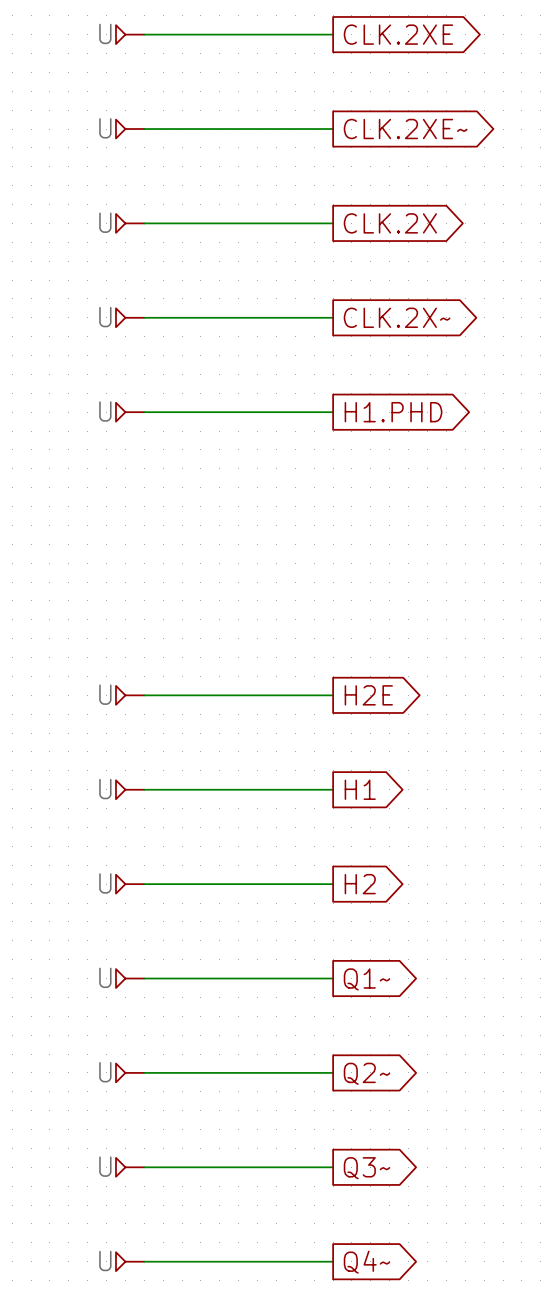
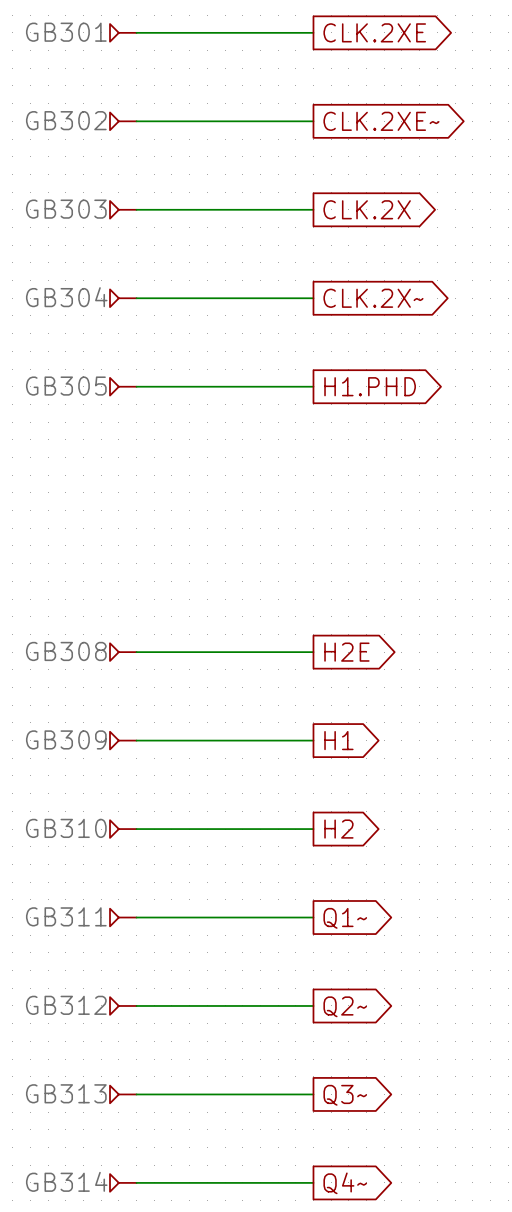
U name: U (105, 33) -> GB301 (66, 32)
U name: U (105, 128) -> GB302 (66, 120)
U name: U (105, 222) -> GB303 (66, 209)
U name: U (105, 317) -> GB304 (66, 297)
U name: U (105, 411) -> GB305 (66, 386)
U name: U (105, 694) -> GB308 (66, 651)
U name: U (105, 789) -> GB309 (66, 739)
U name: U (105, 883) -> GB310 (66, 828)
U name: U (105, 977) -> GB311 (66, 916)
U name: U (105, 1072) -> GB312 (66, 1005)
U name: U (105, 1166) -> GB313 (66, 1093)
U name: U (105, 1261) -> GB314 (66, 1181)

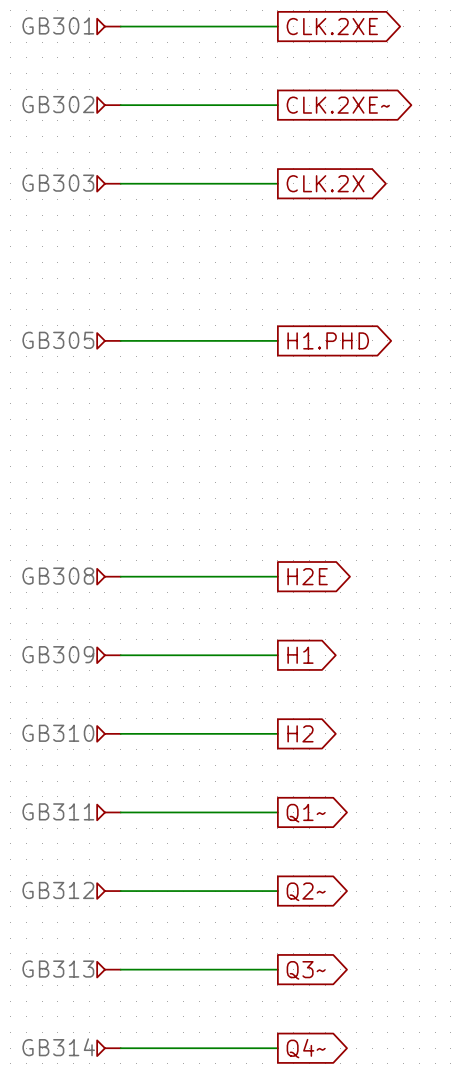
GB304: (123, 298) -> none
wire: (136, 298) (313, 298) -> none
global label: CLK.2X~ (373, 298) -> none

